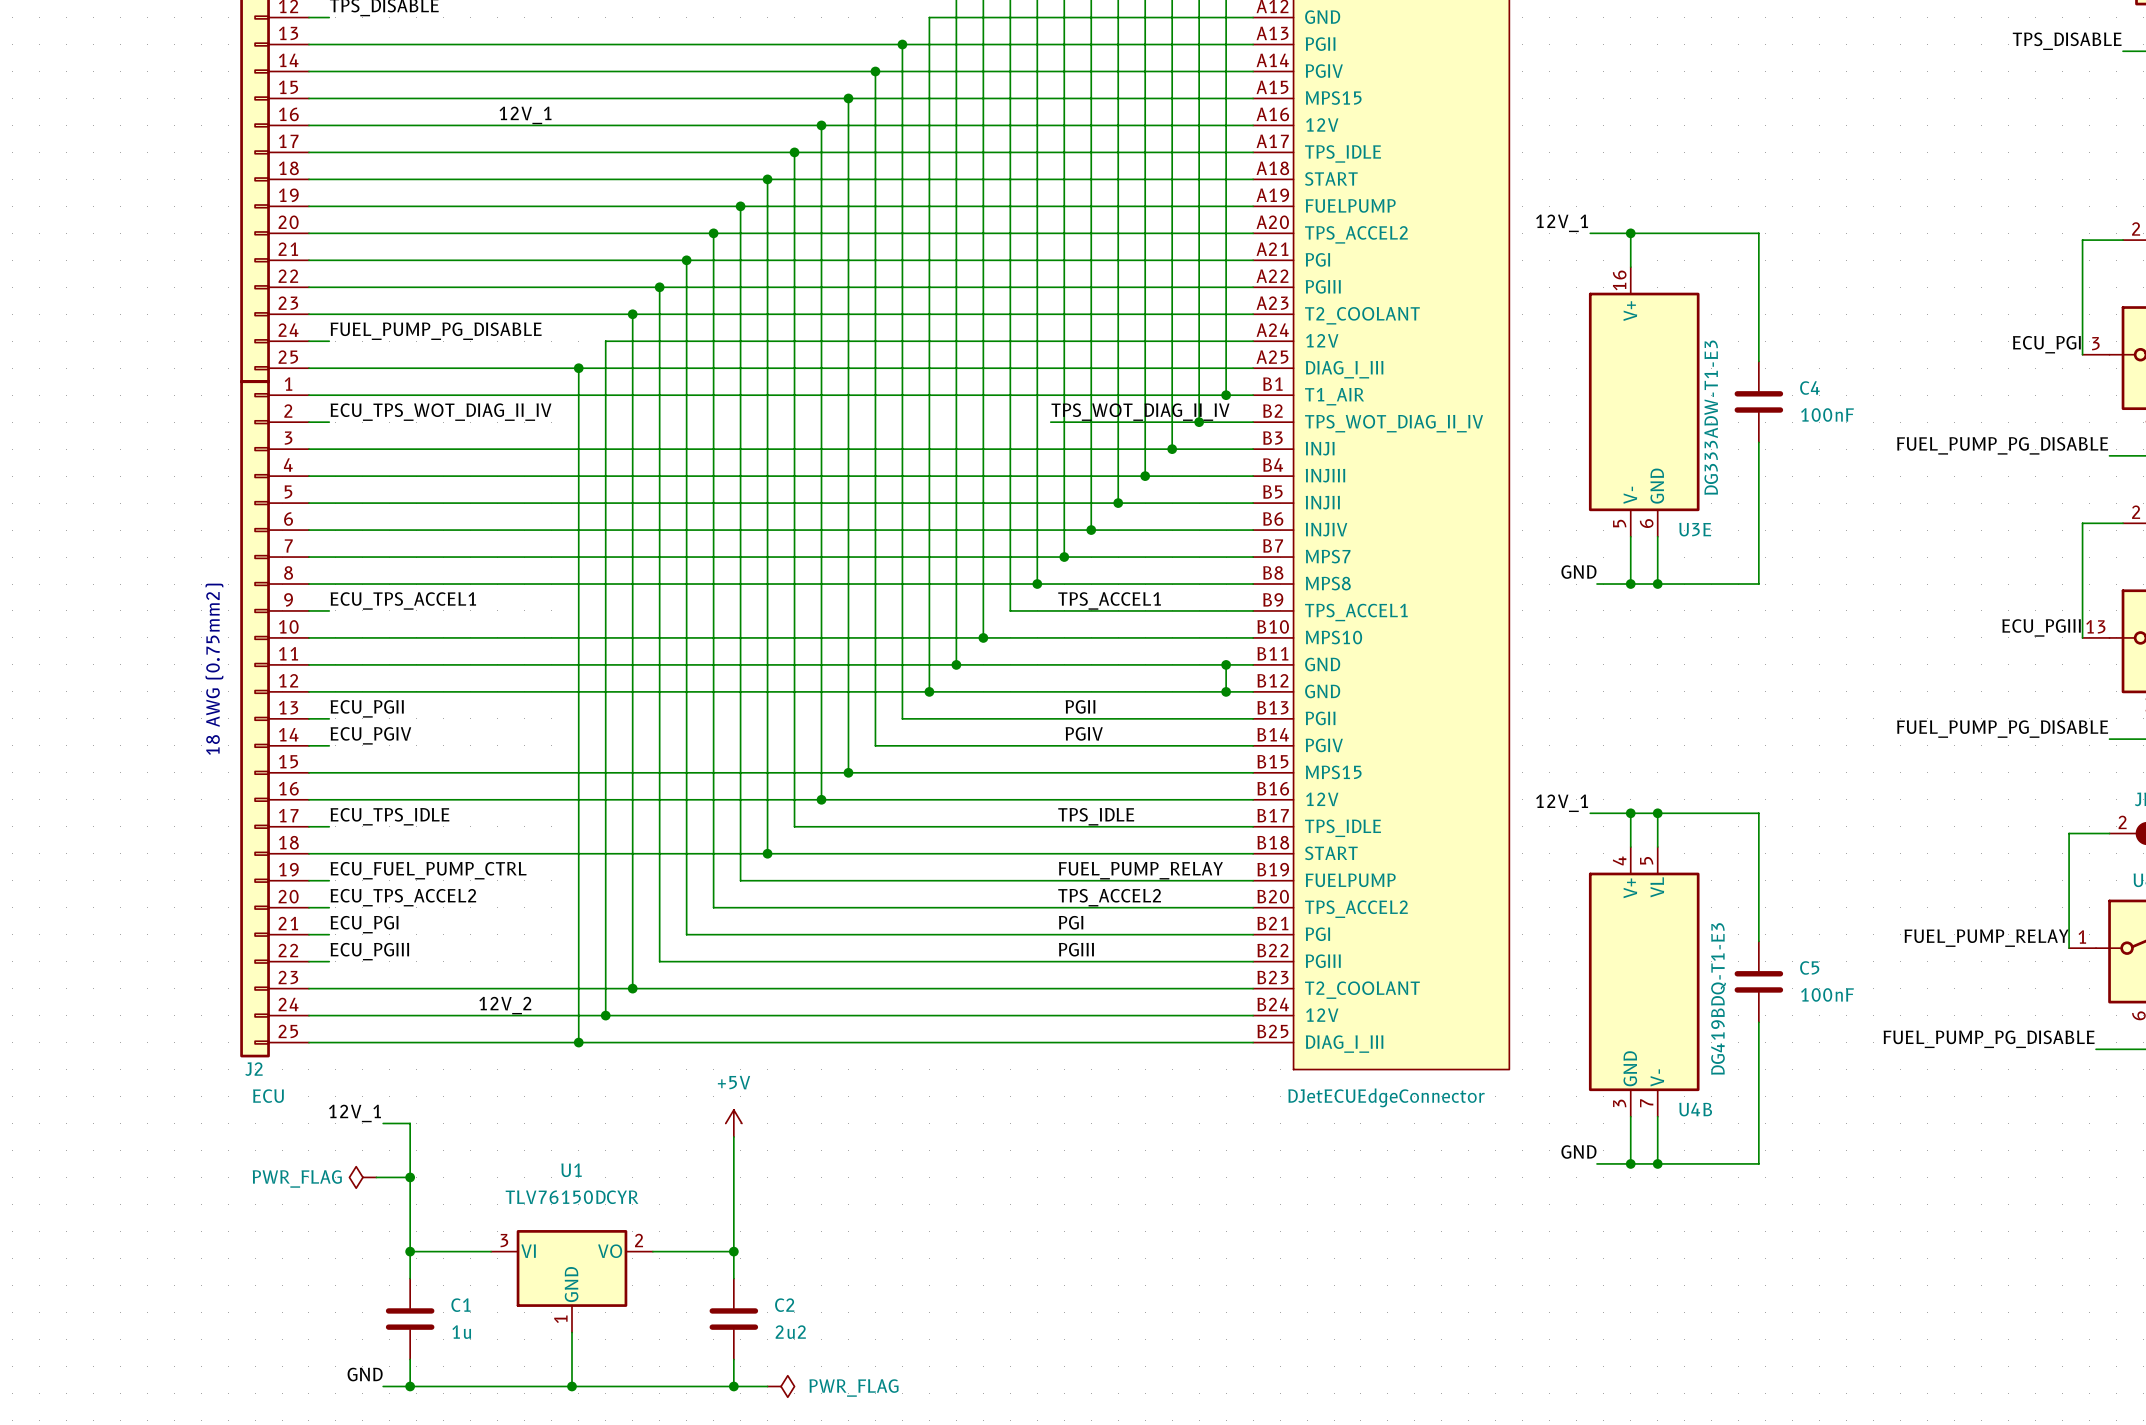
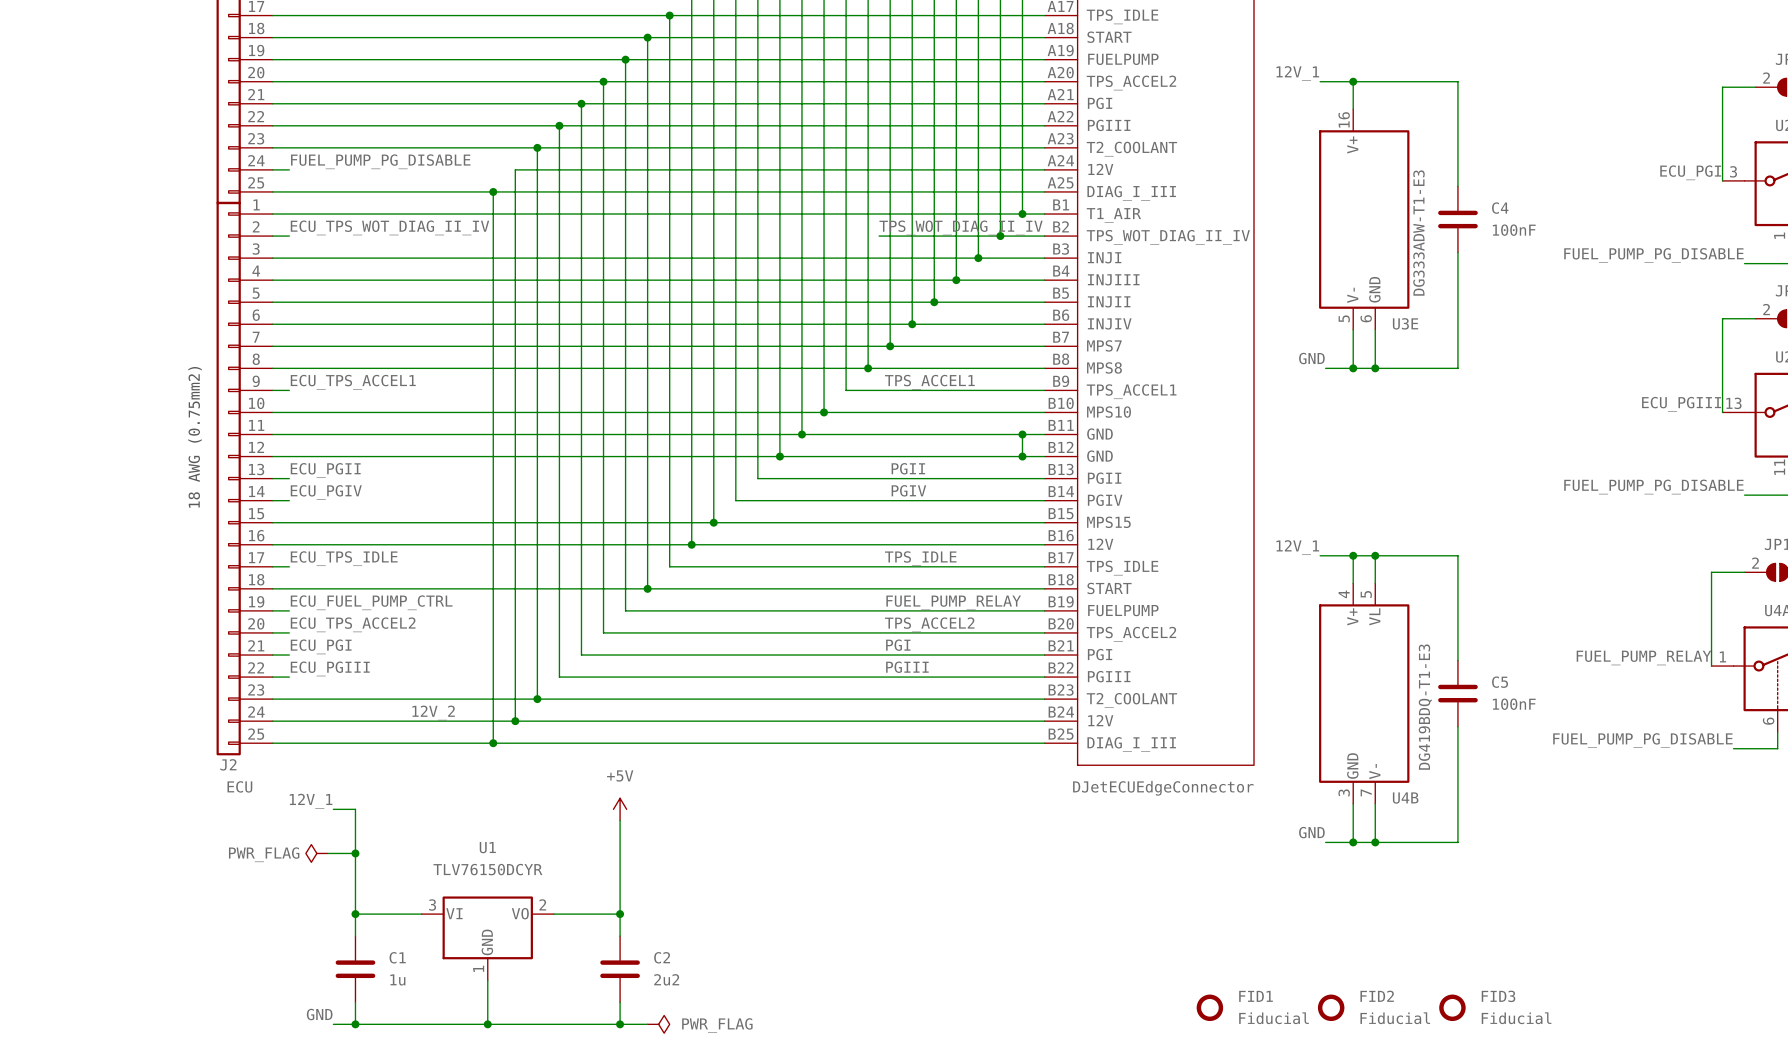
FID1: none -> Fiducial (1209, 1007)
FID2: none -> Fiducial (1331, 1007)
FID3: none -> Fiducial (1452, 1007)

